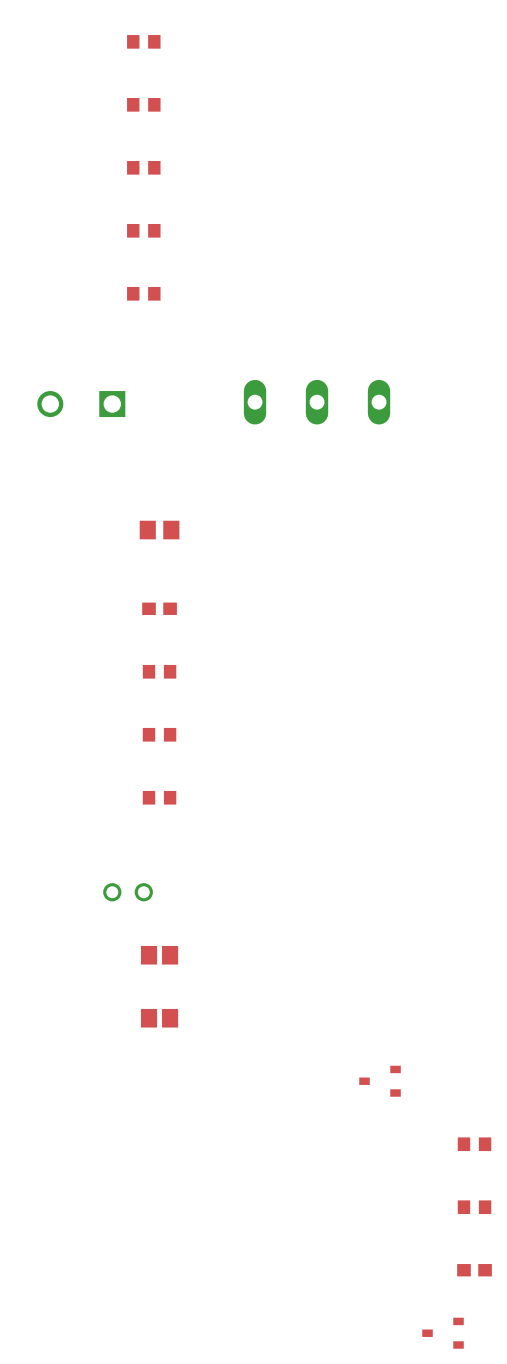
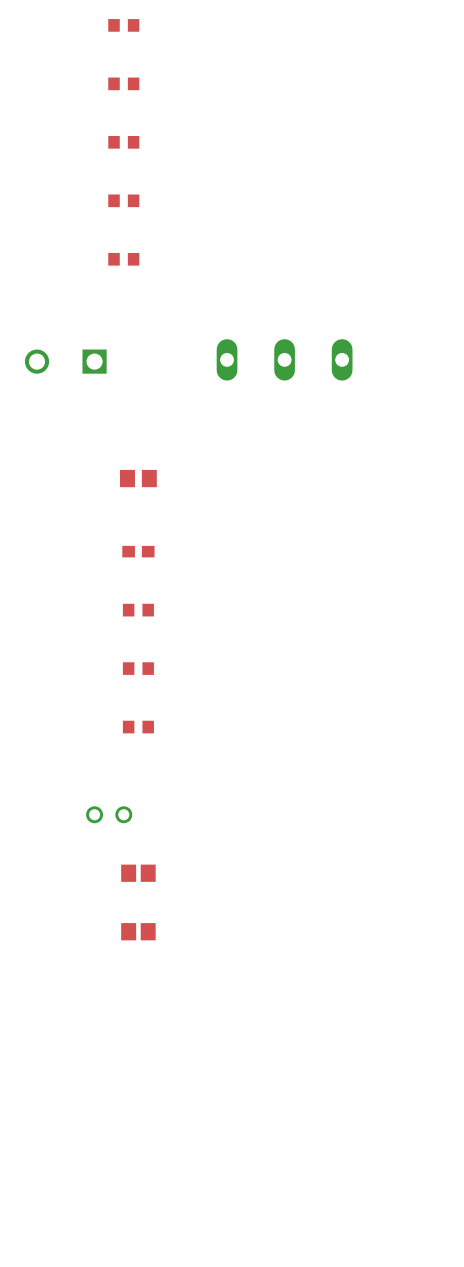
part: (380, 1081) -> none
part: (474, 1144) -> none
part: (474, 1207) -> none
part: (474, 1270) -> none
part: (443, 1333) -> none

